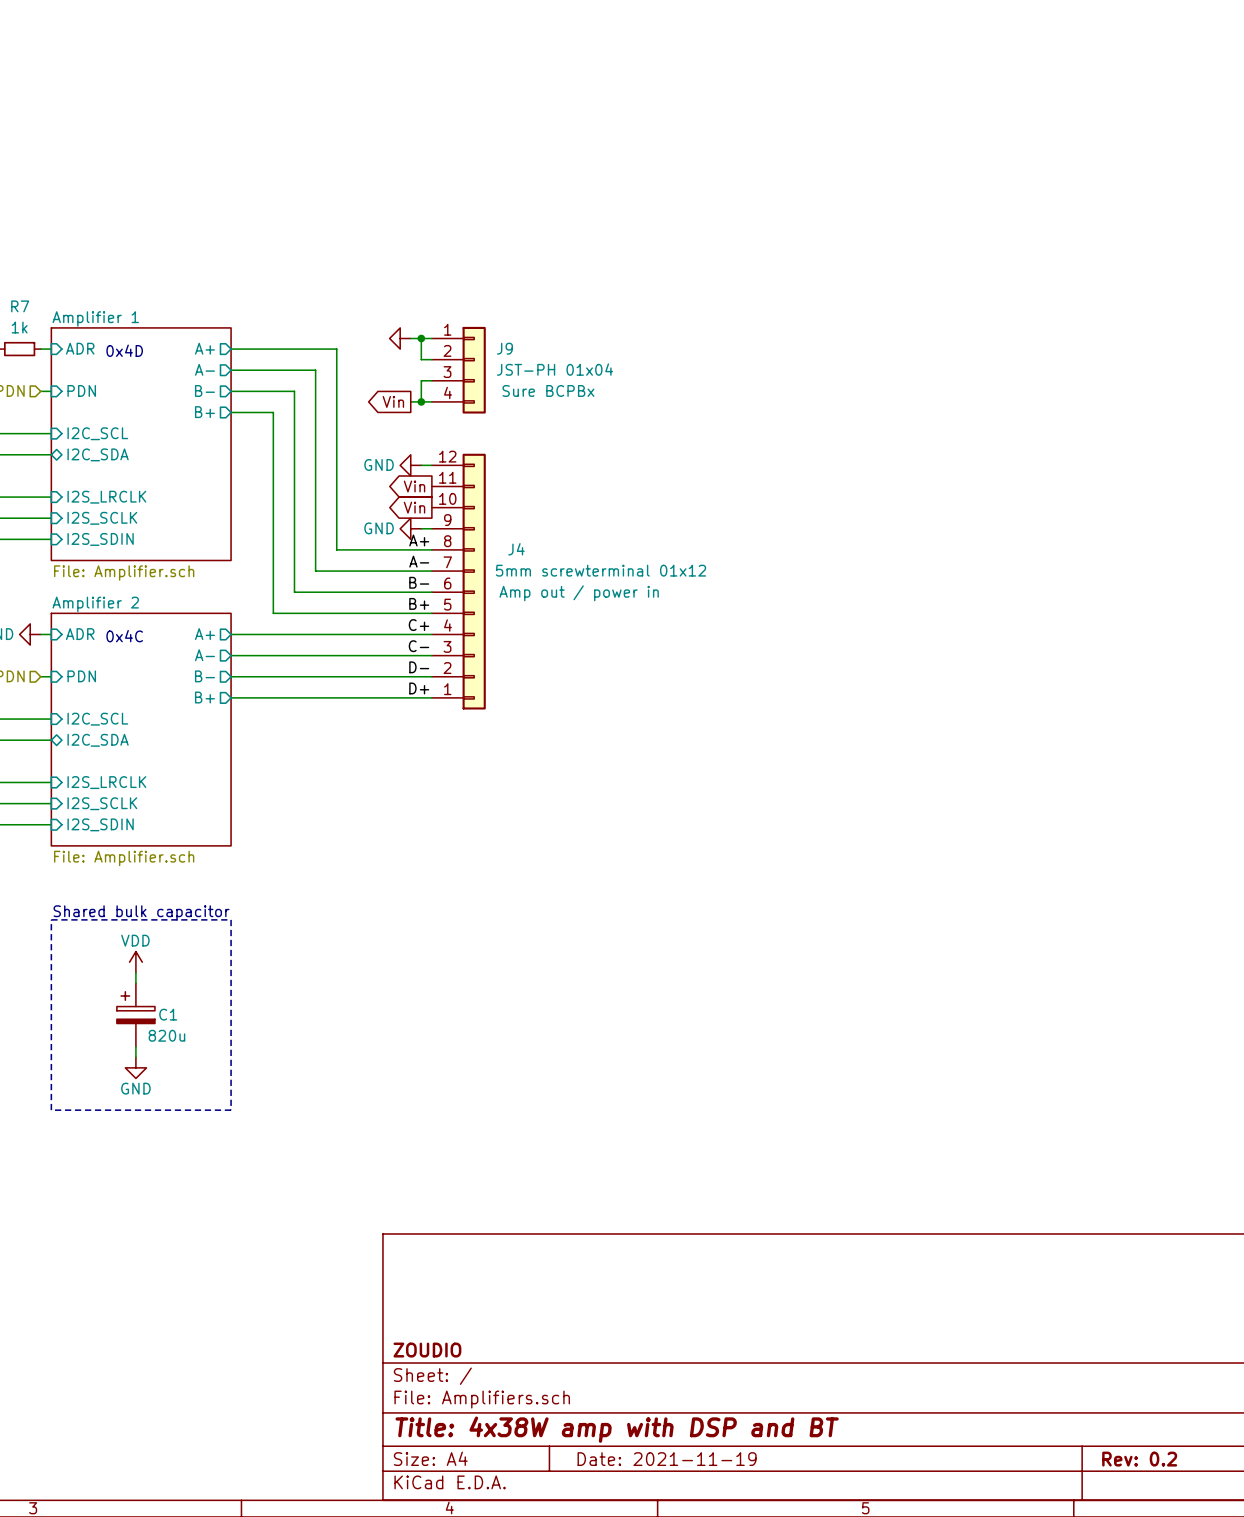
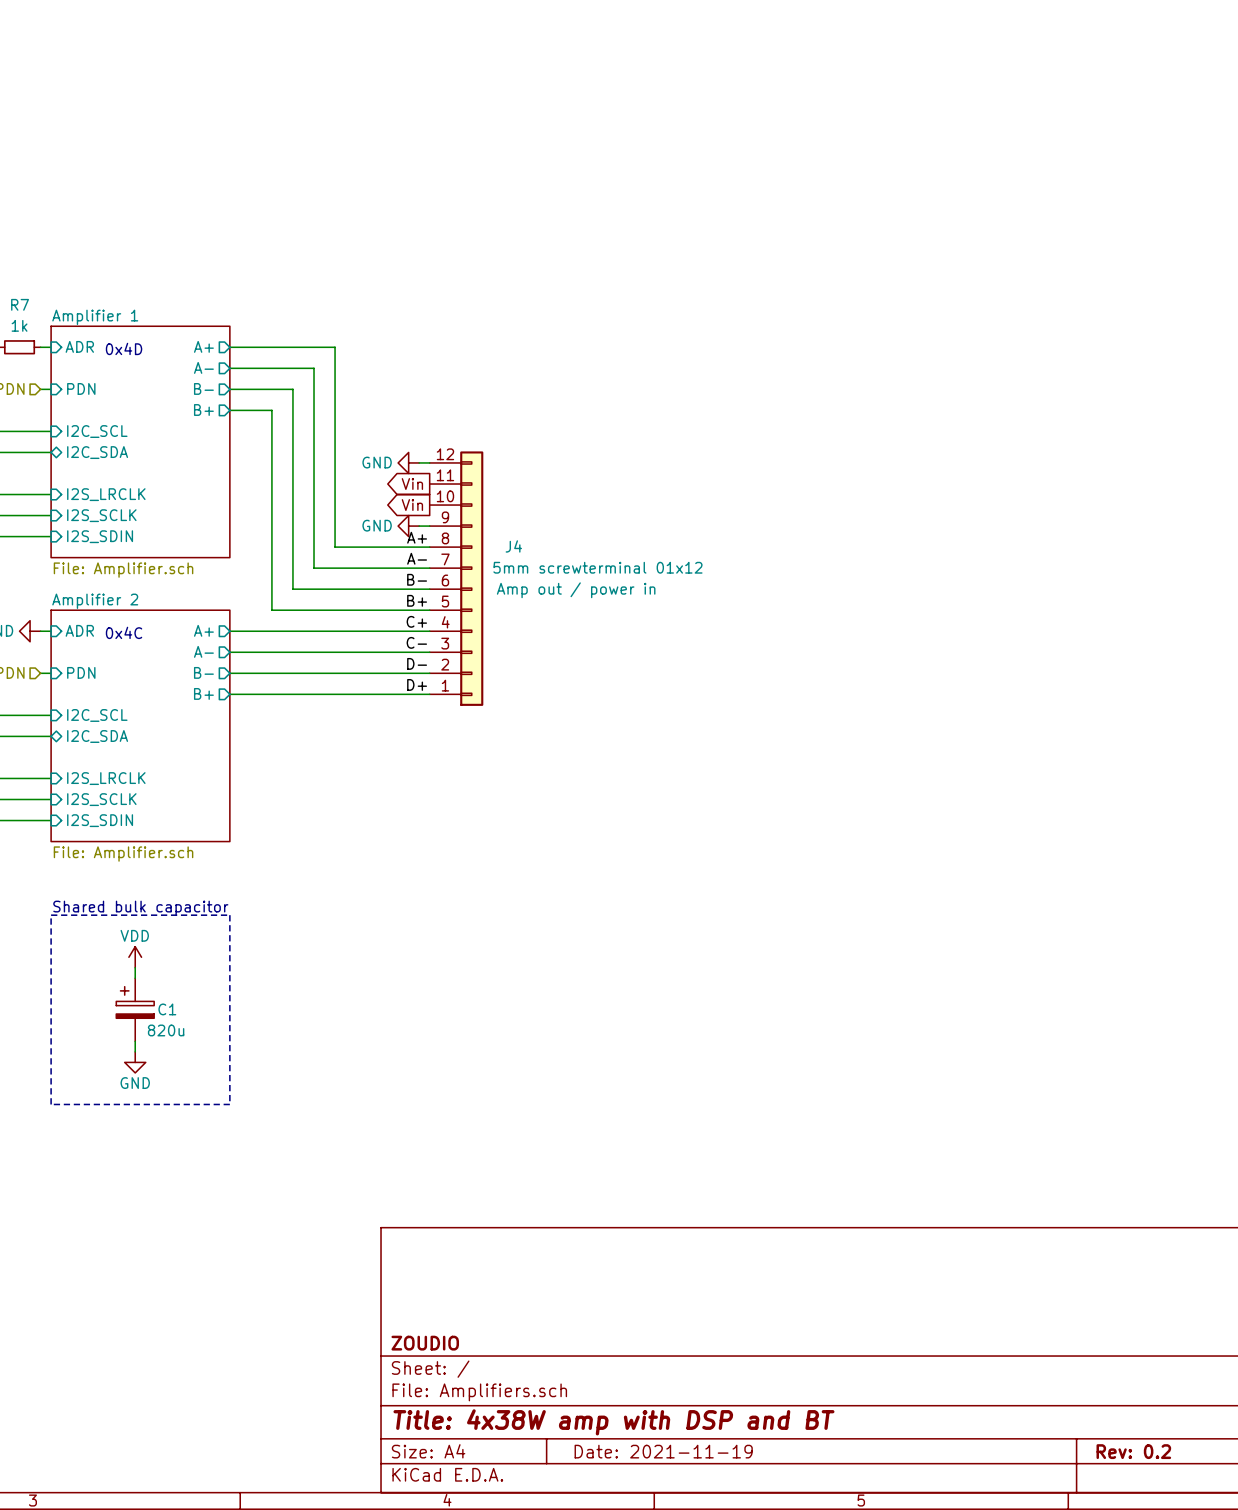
power symbol: (400, 338) -> none
wire: (410, 338) (431, 338) -> none
wire: (421, 338) (421, 359) (431, 359) -> none
junction: (421, 338) -> none
J9: JST-PH 01x04 (458, 370) -> none
wire: (431, 380) (421, 380) (421, 401) -> none
global label: Vin (393, 401) -> none
wire: (410, 401) (431, 401) -> none
junction: (421, 401) -> none

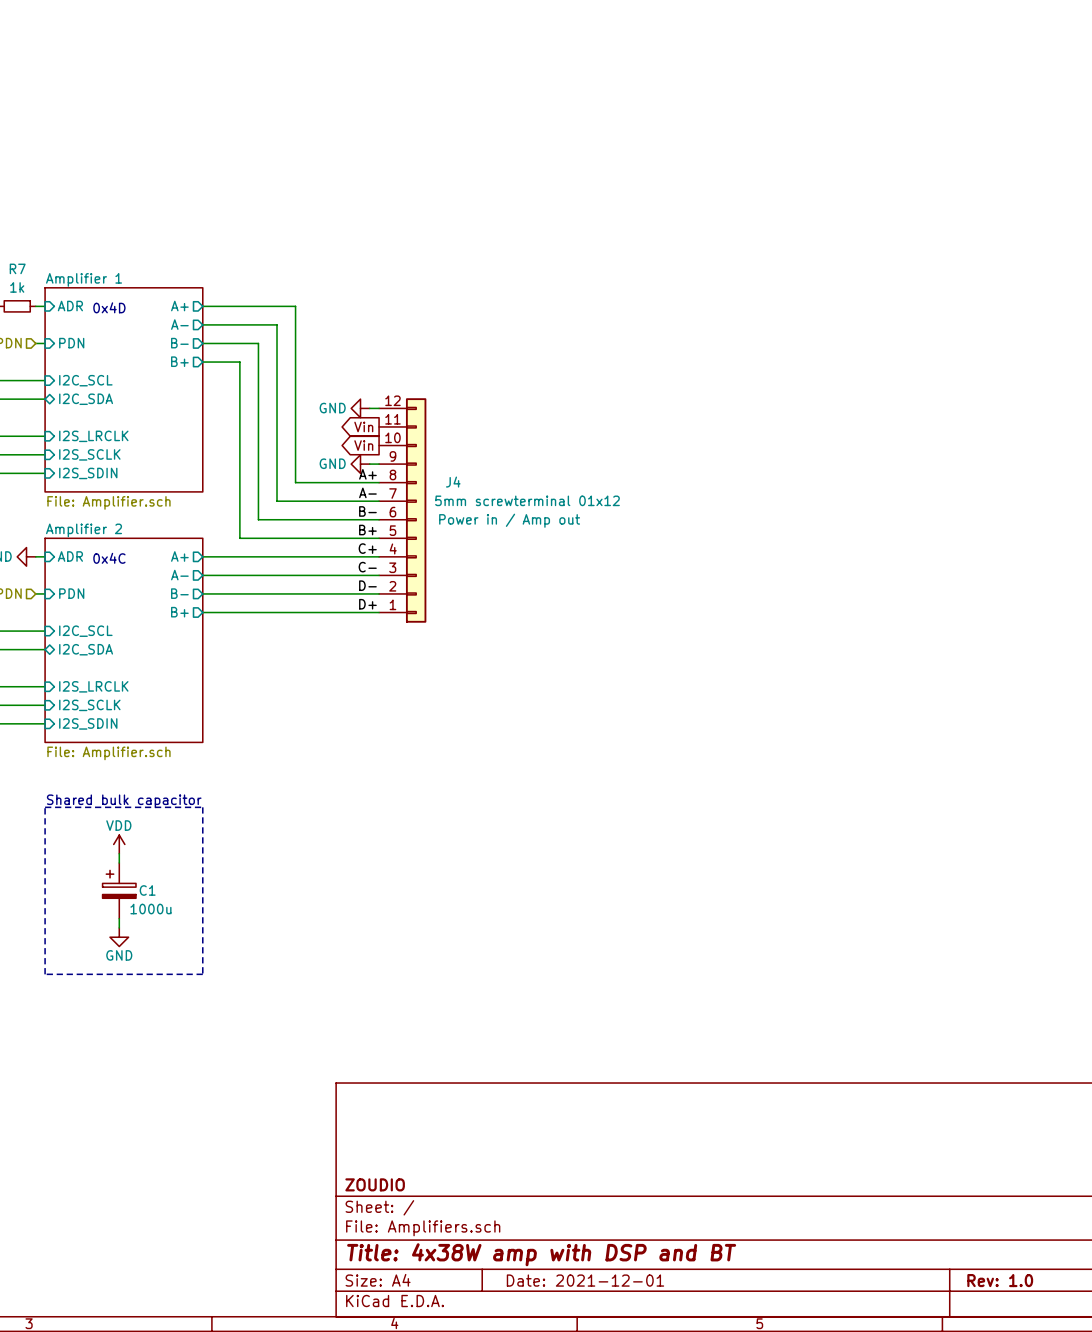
J4 text: Amp out / power in (576, 590) -> Power in / Amp out (509, 520)
C1 value: 820u (166, 1030) -> 1000u (150, 909)
title block: Date: 2021-11-19 (663, 1451) -> Date: 2021-12-01 (585, 1280)
title block: Rev: 0.2 (1133, 1451) -> Rev: 1.0 (1000, 1280)

